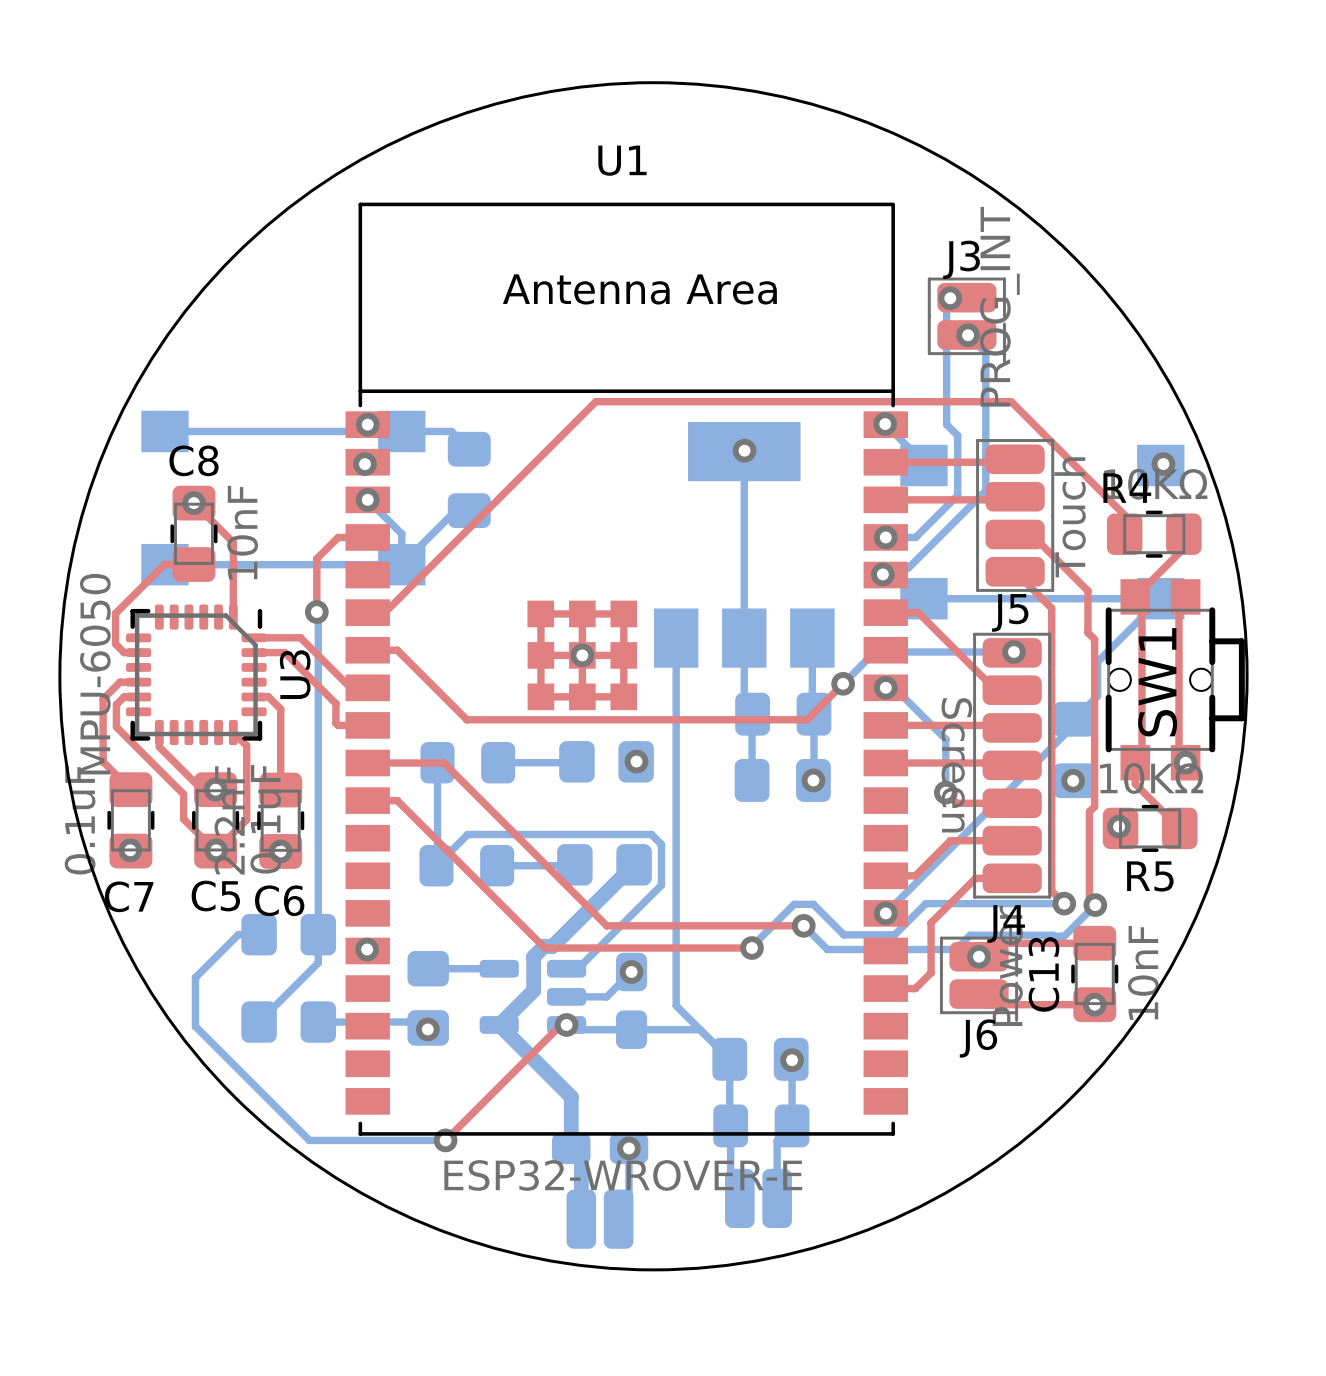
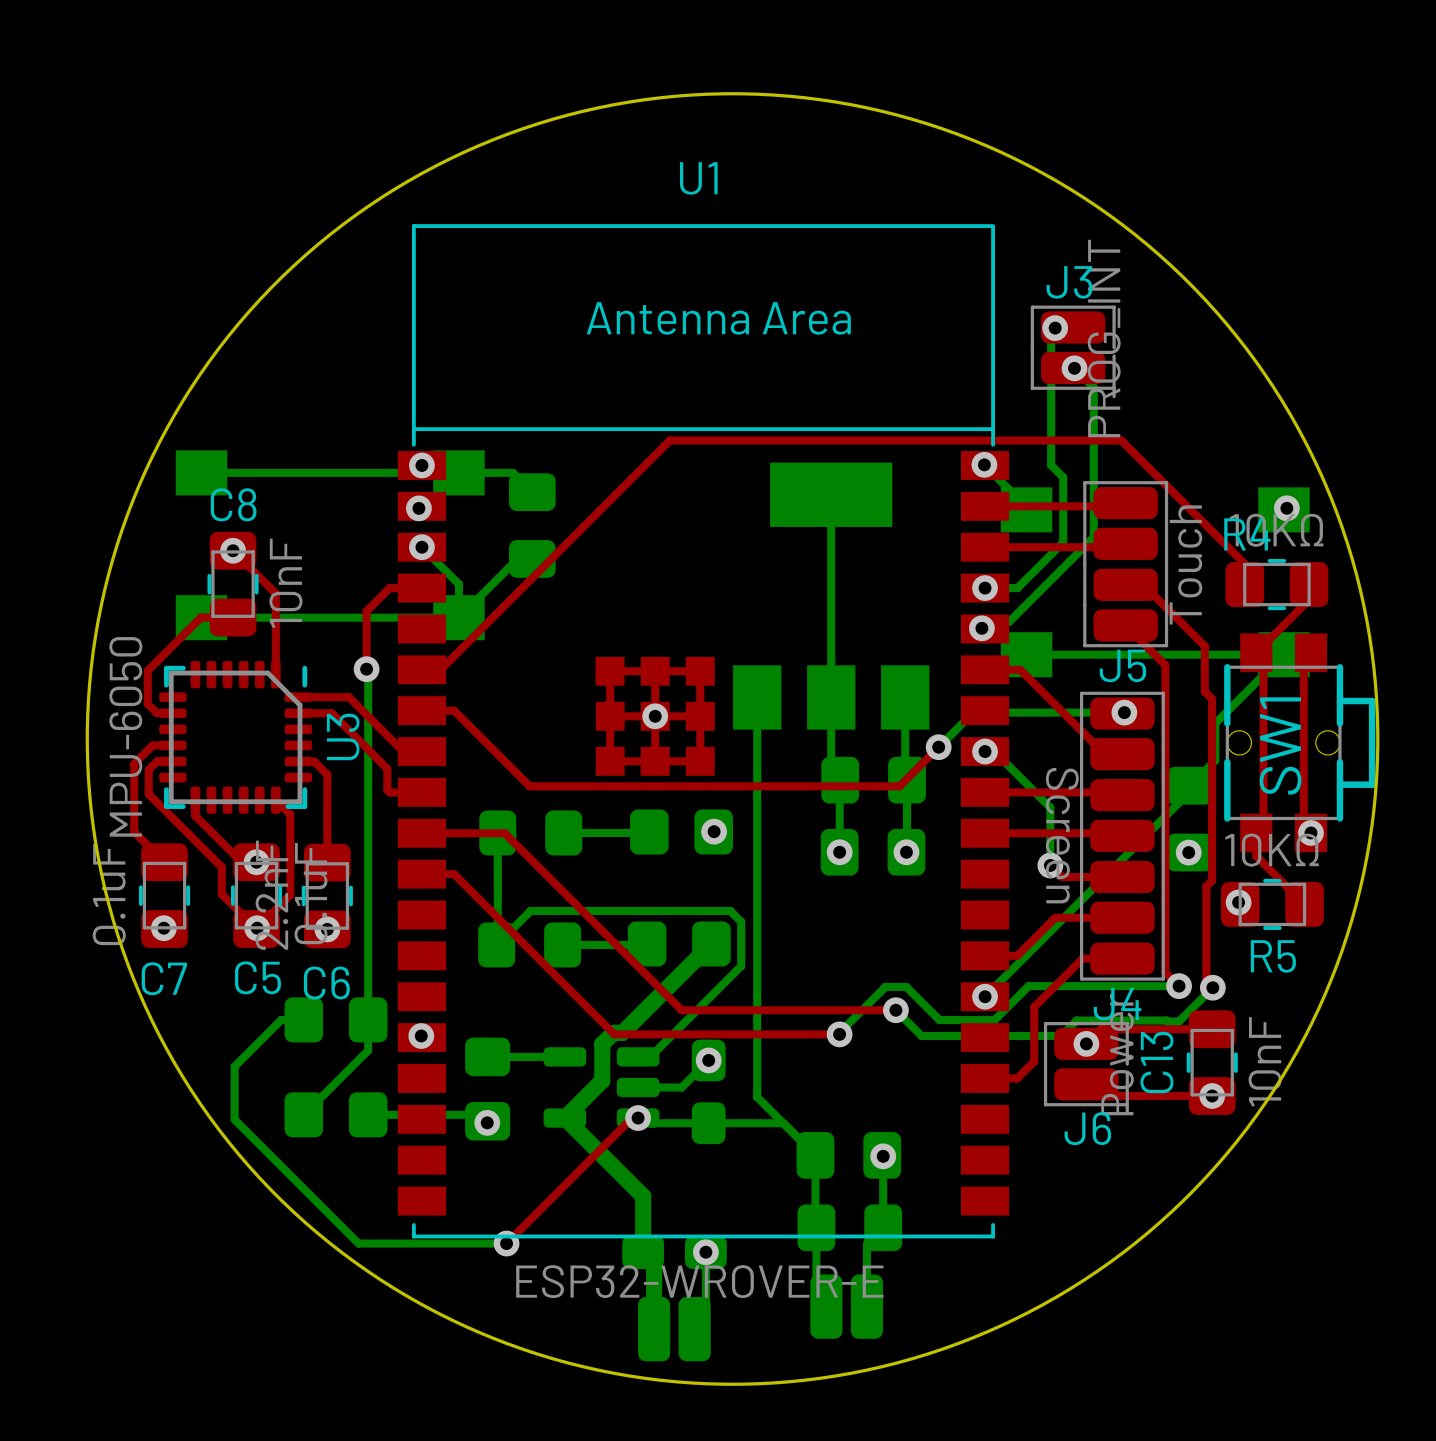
via: (744, 450) -> none
via: none -> (839, 852)

